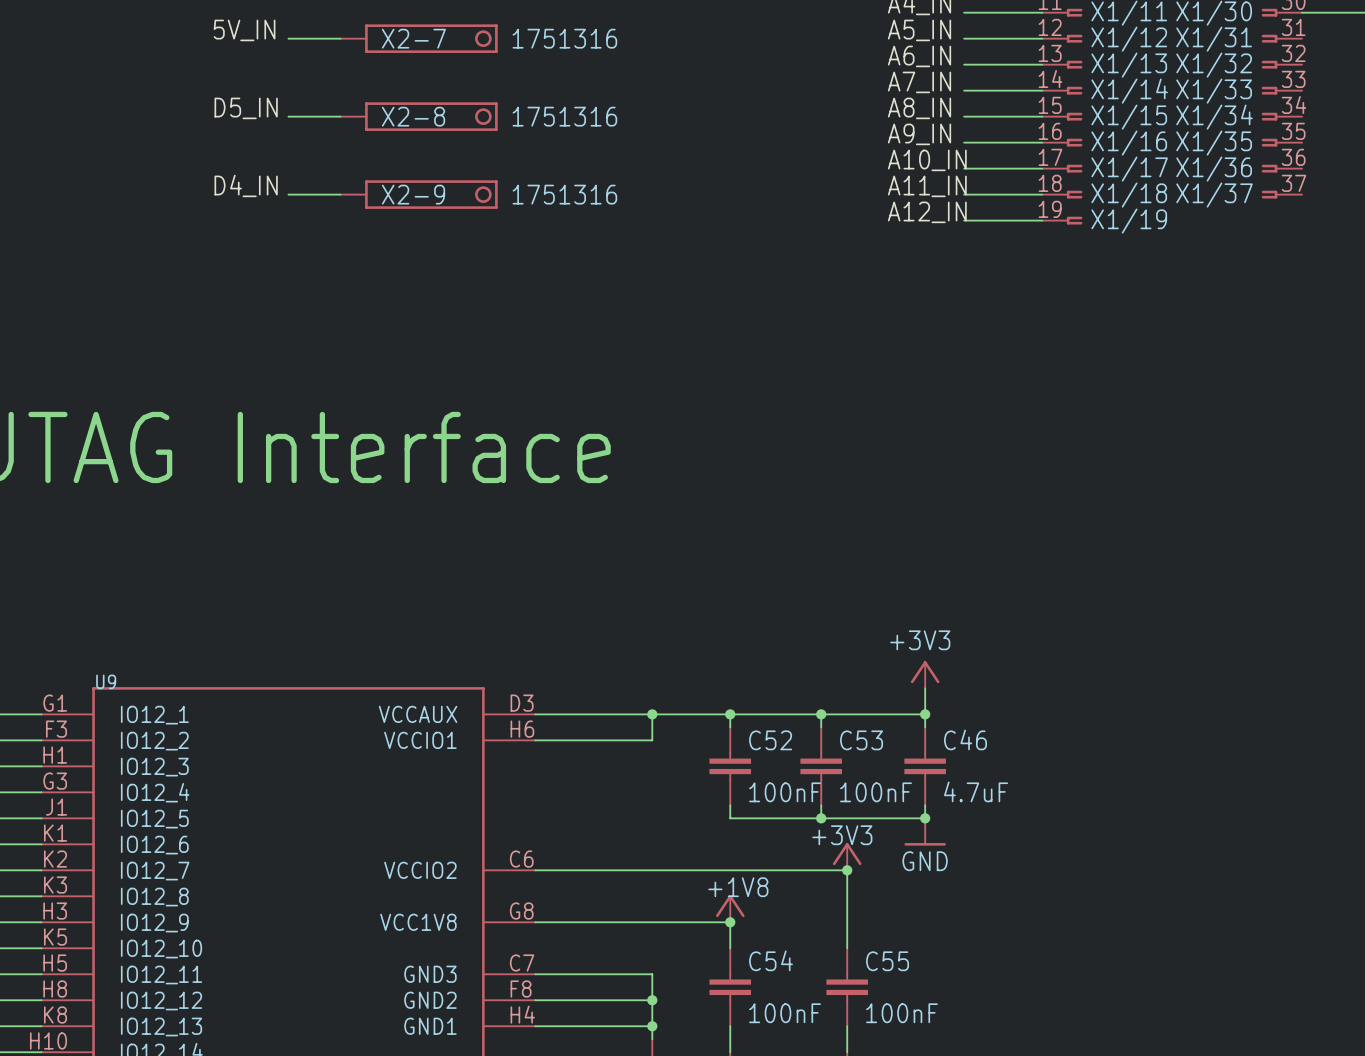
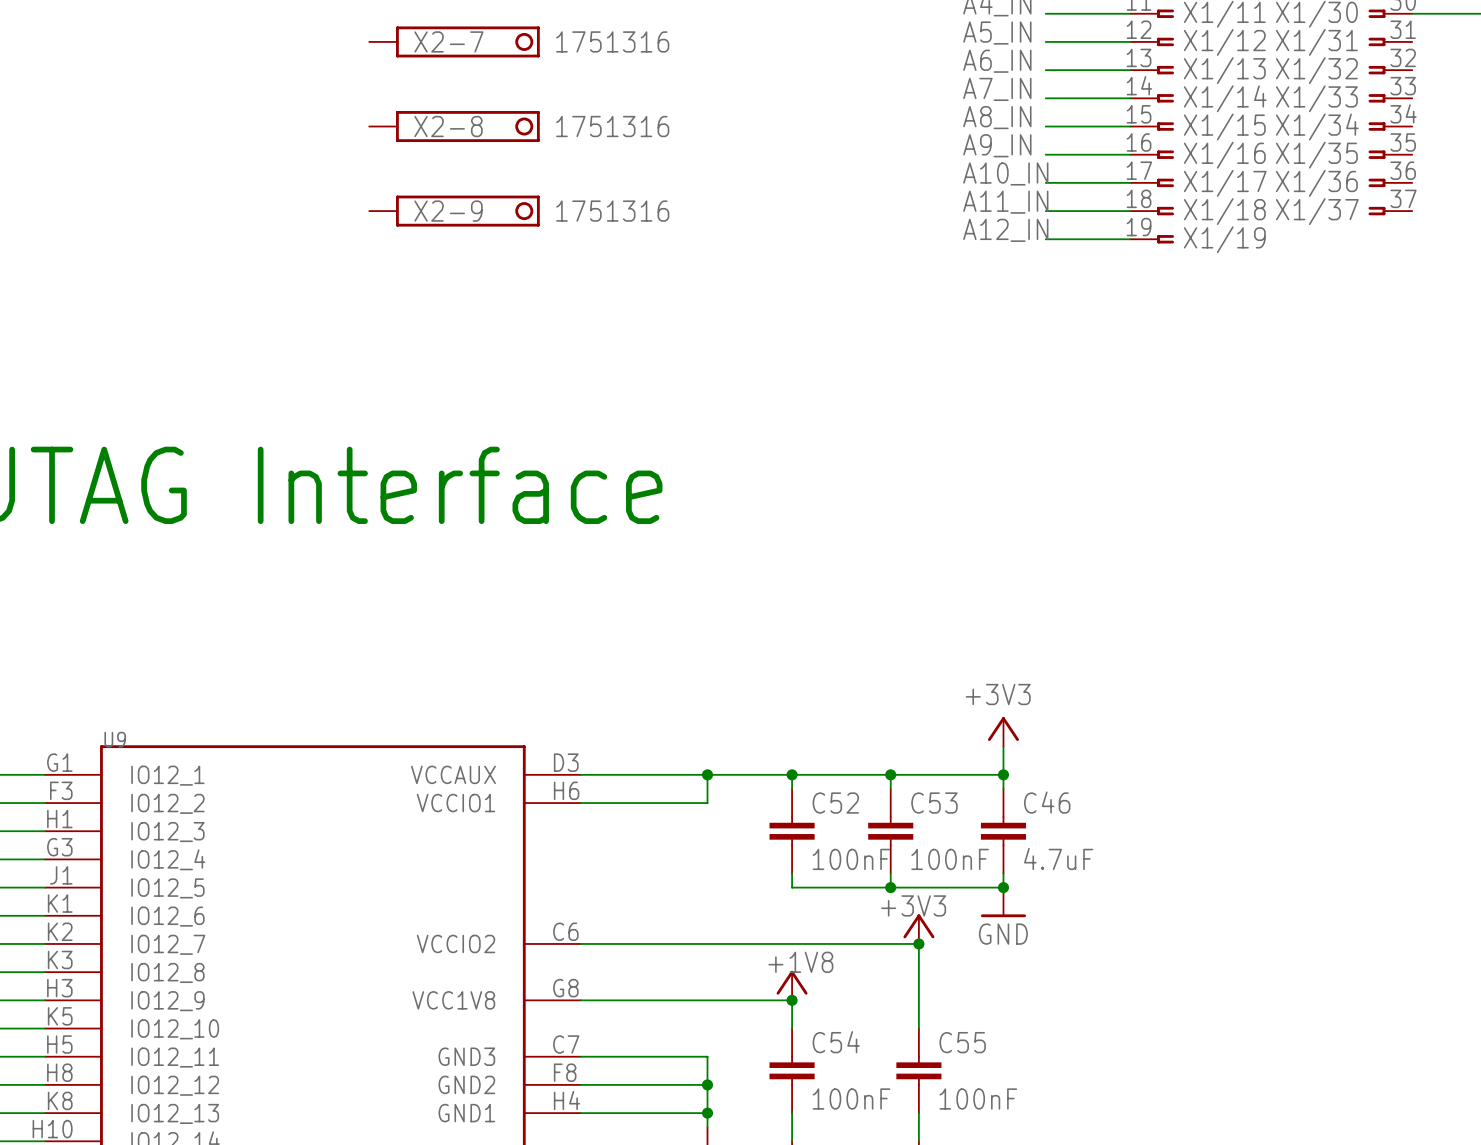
label: 5V_IN (244, 30) -> none
wire: (288, 38) (340, 38) -> none
label: D5_IN (246, 108) -> none
wire: (288, 116) (340, 116) -> none
label: D4_IN (246, 185) -> none
wire: (288, 194) (340, 194) -> none

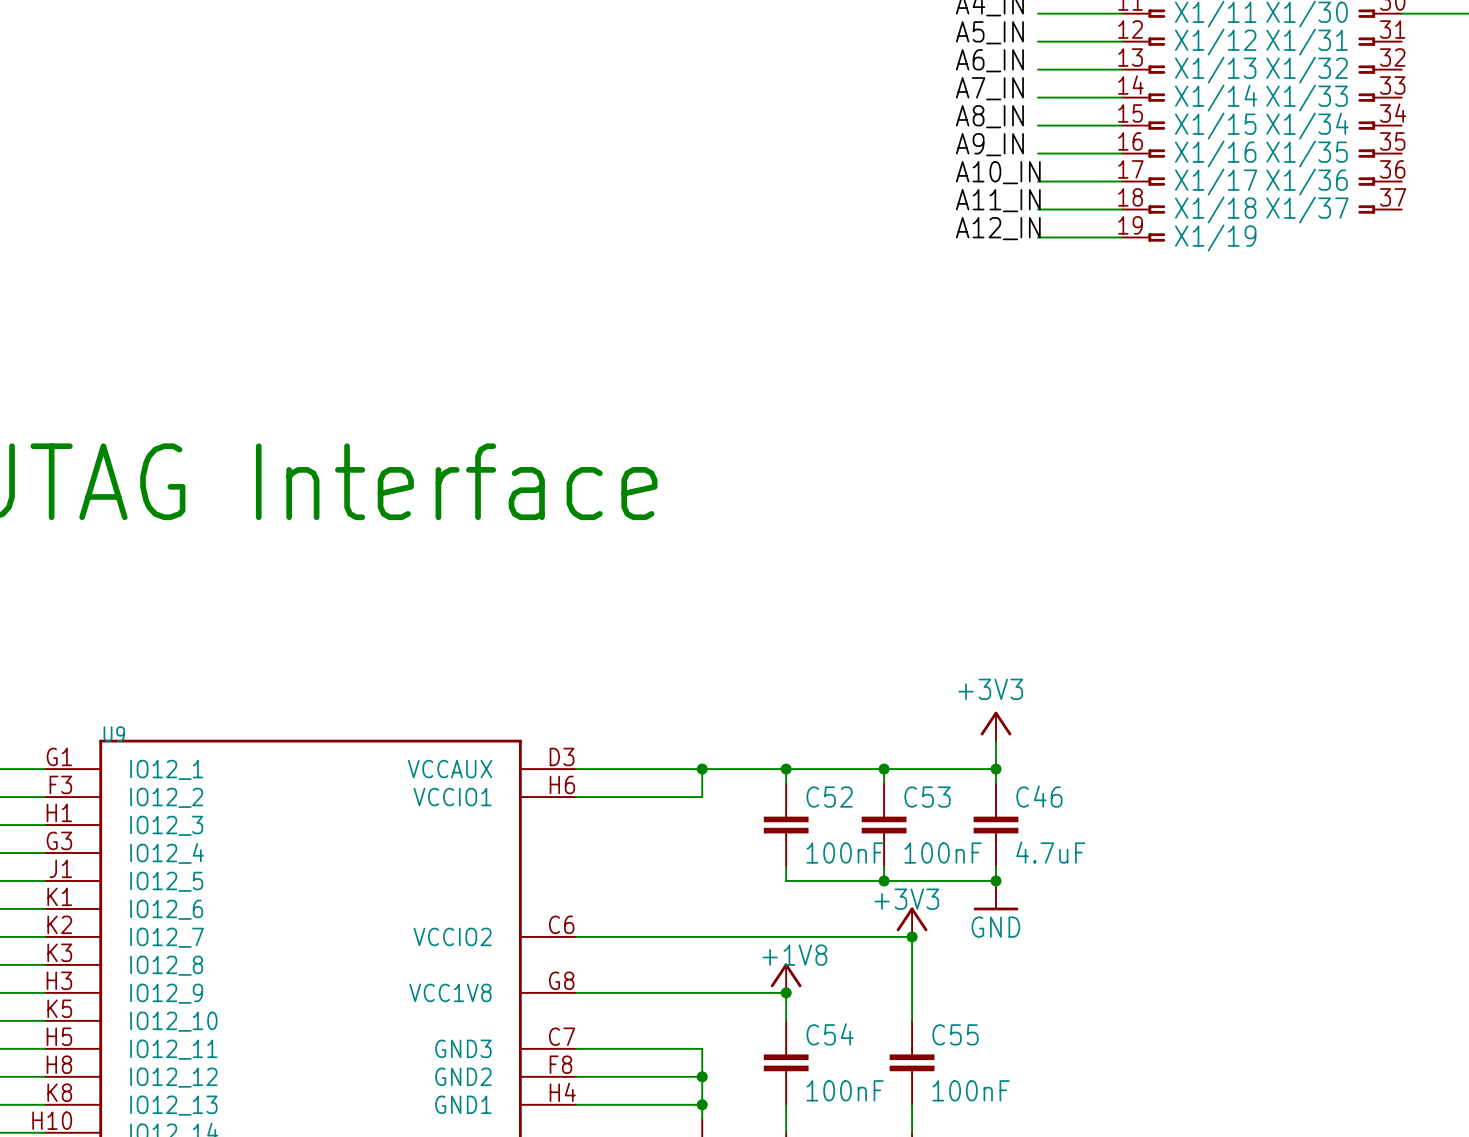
X2-7: 1751316 (454, 41) -> none
X2-8: 1751316 (454, 126) -> none
X2-9: 1751316 (454, 211) -> none

